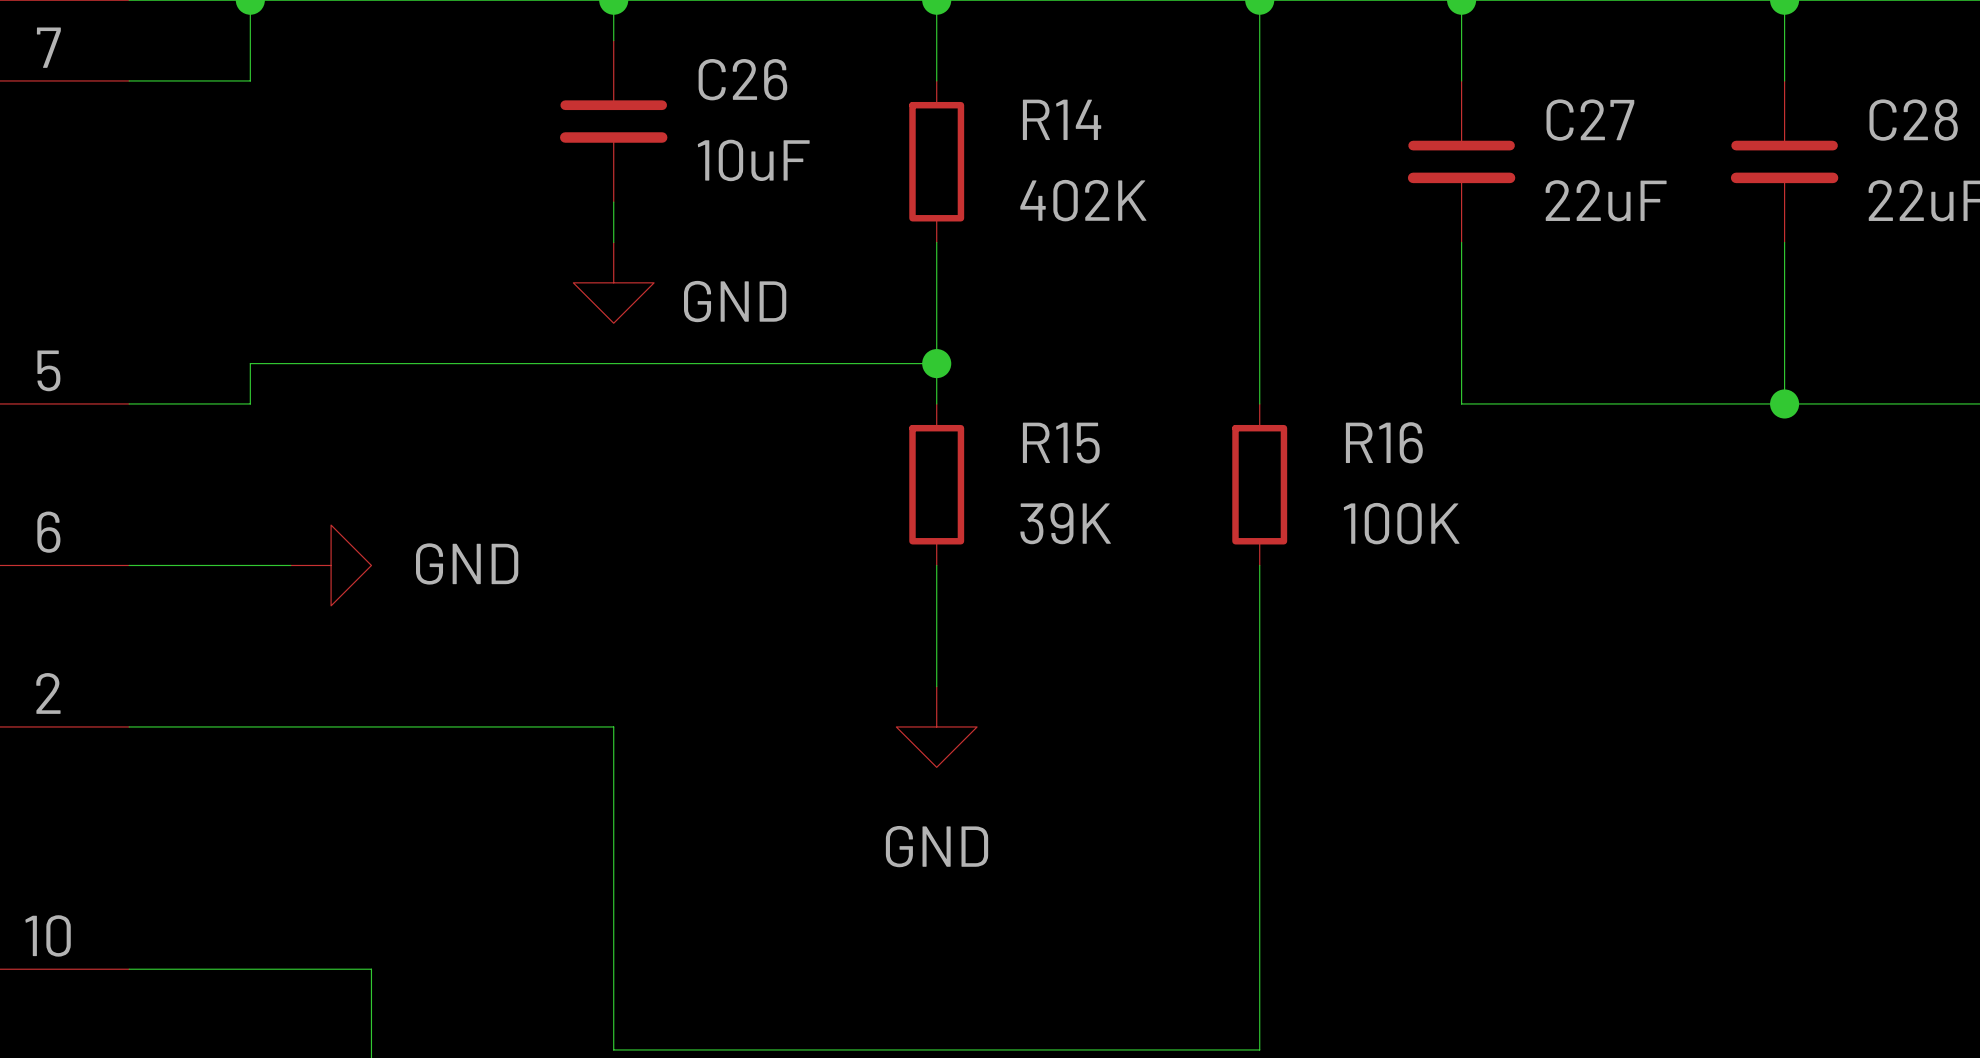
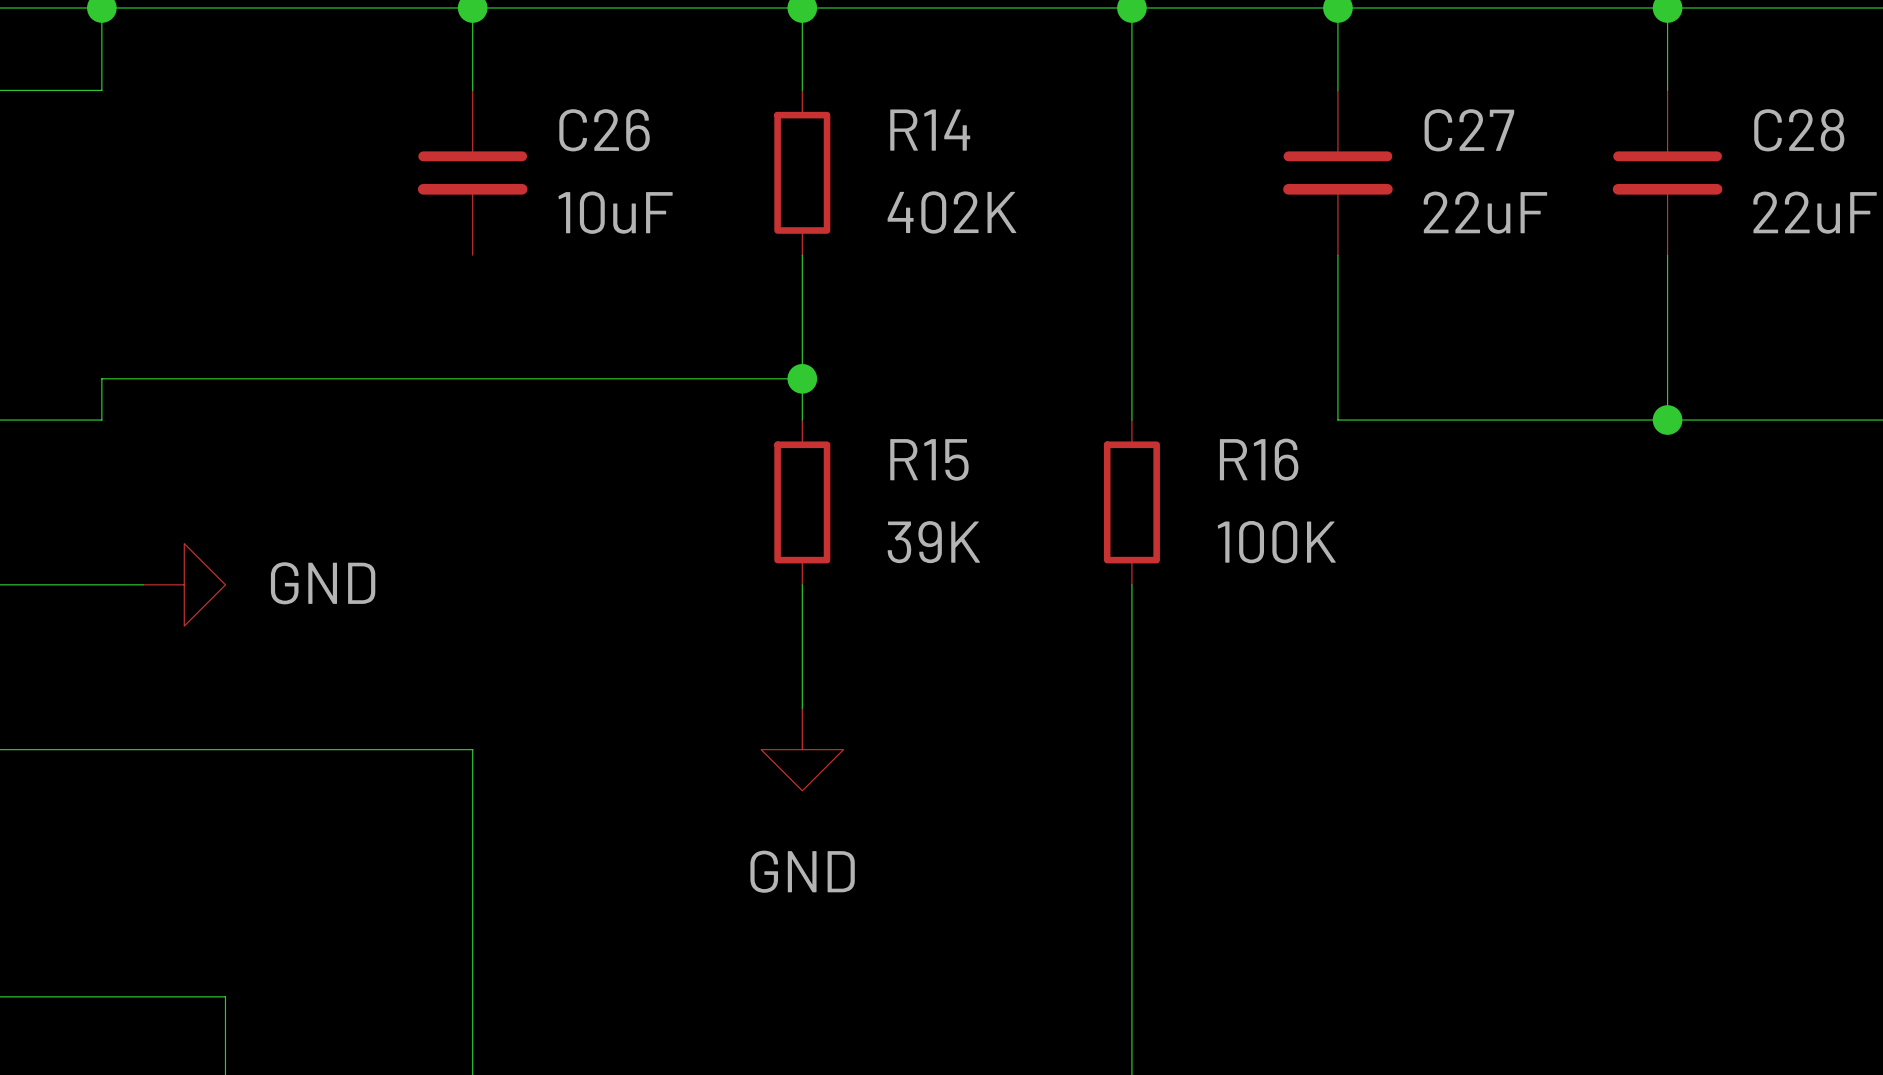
C26 position: (613, 121) -> (472, 172)
power symbol: GND (613, 282) -> none

